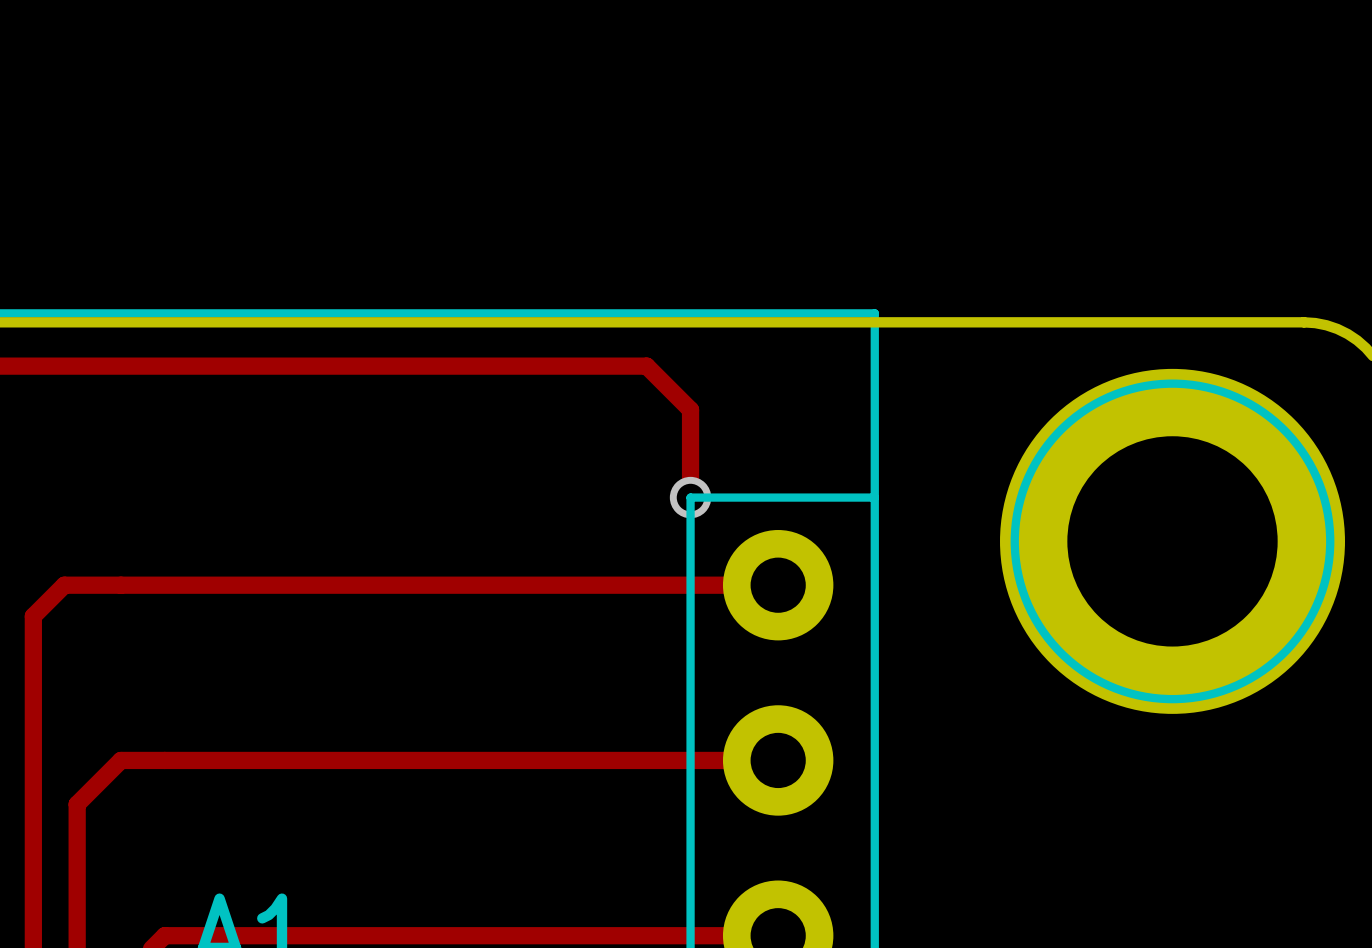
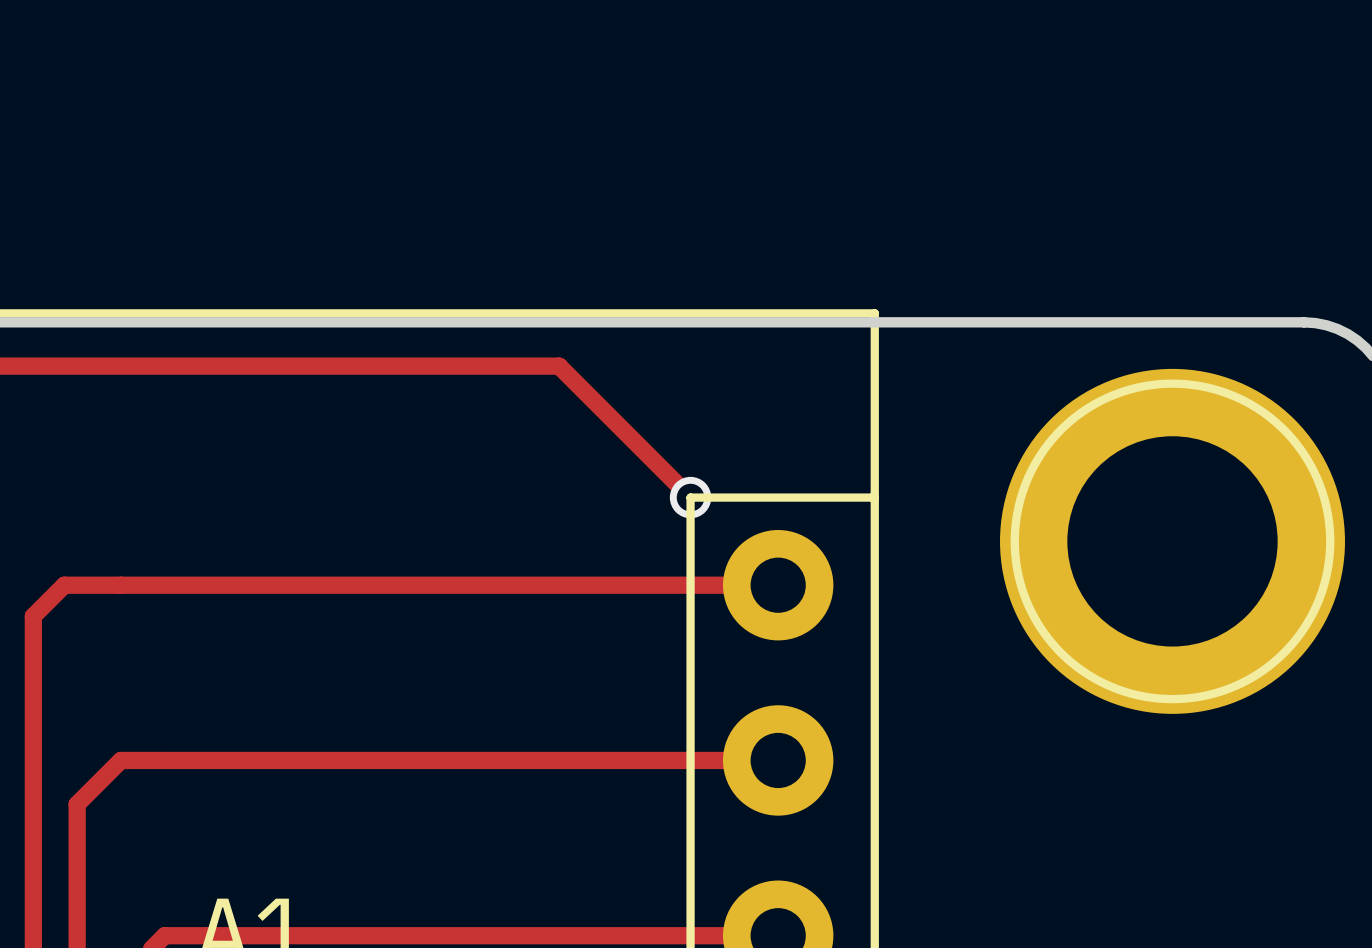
track: (559, 366) (646, 366) (690, 409) (690, 497) -> (559, 366) (690, 497)

